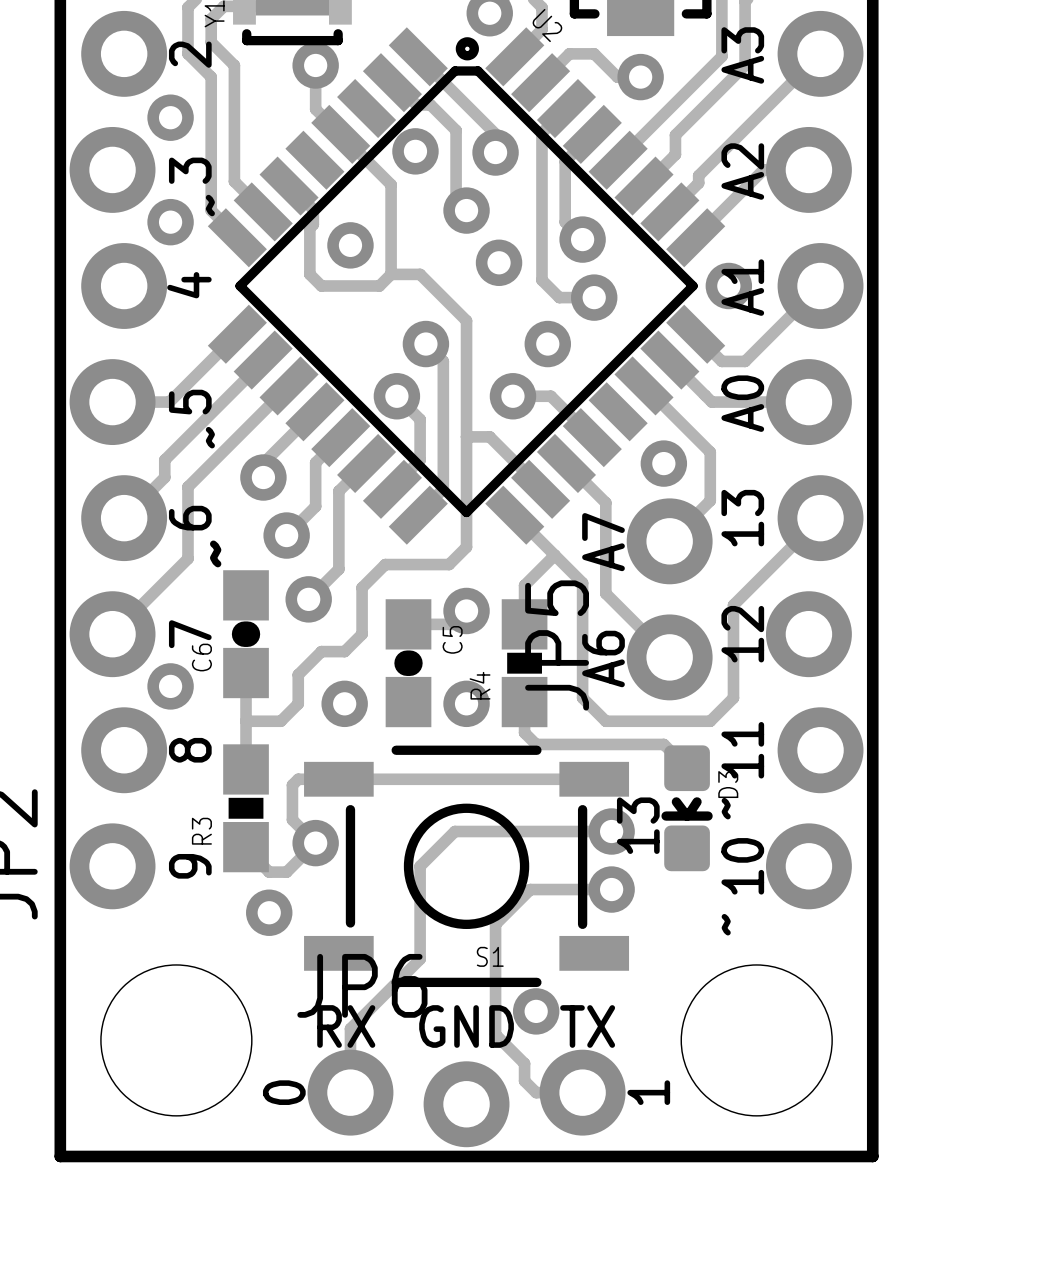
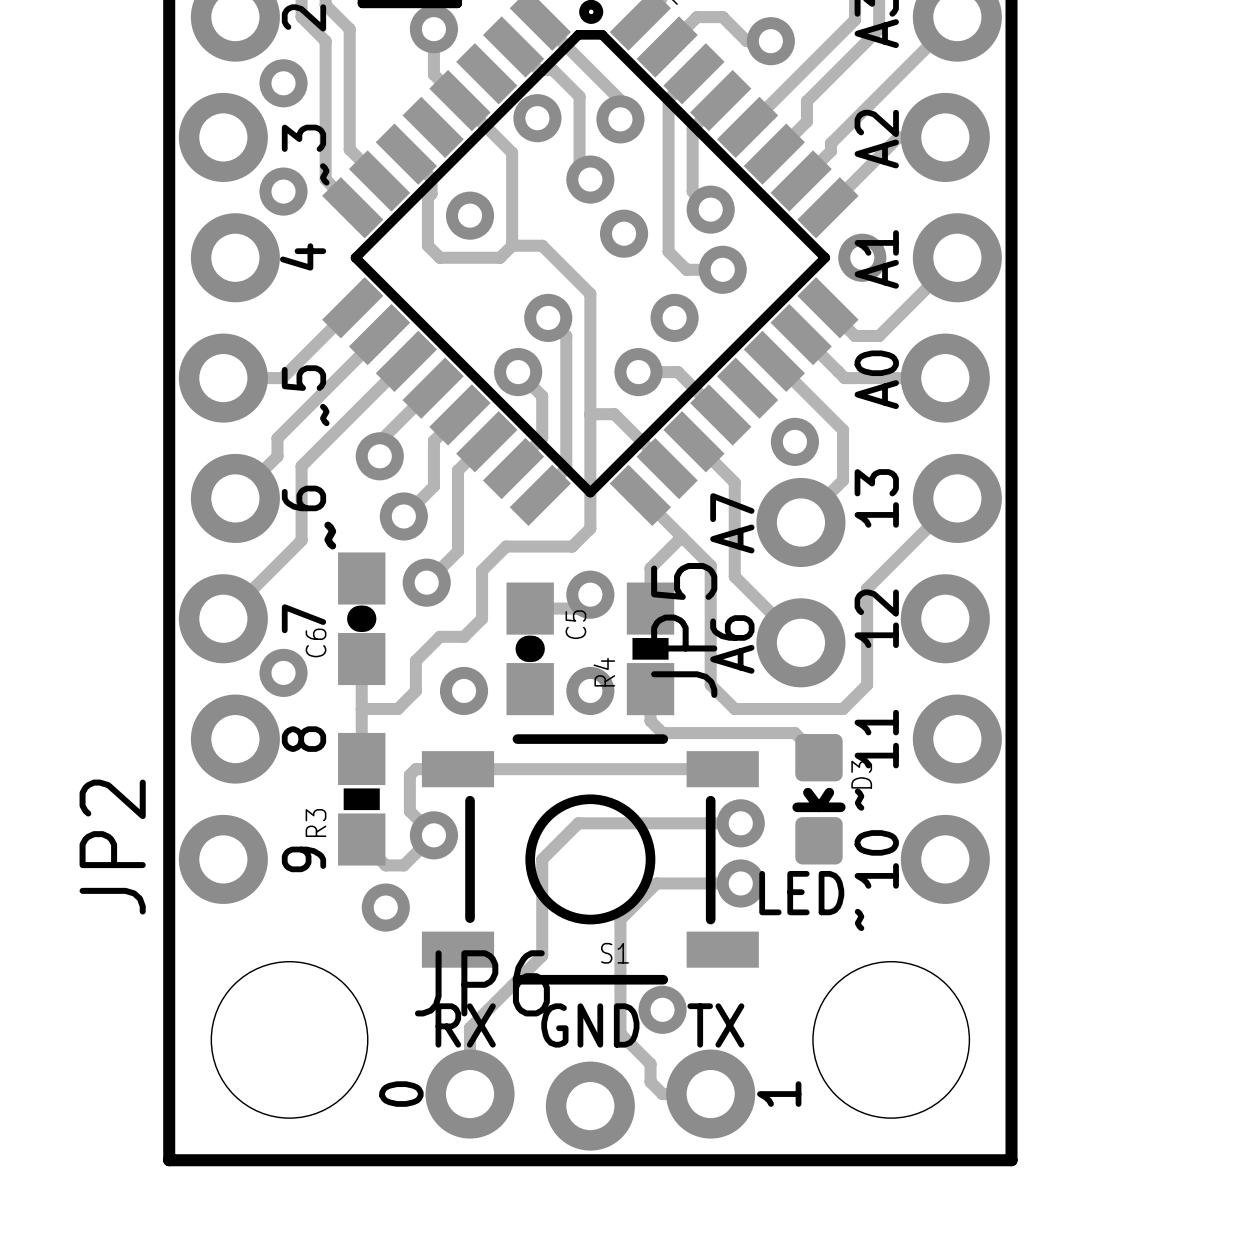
text: 13 (638, 825) -> none
text: none -> LED (801, 893)

